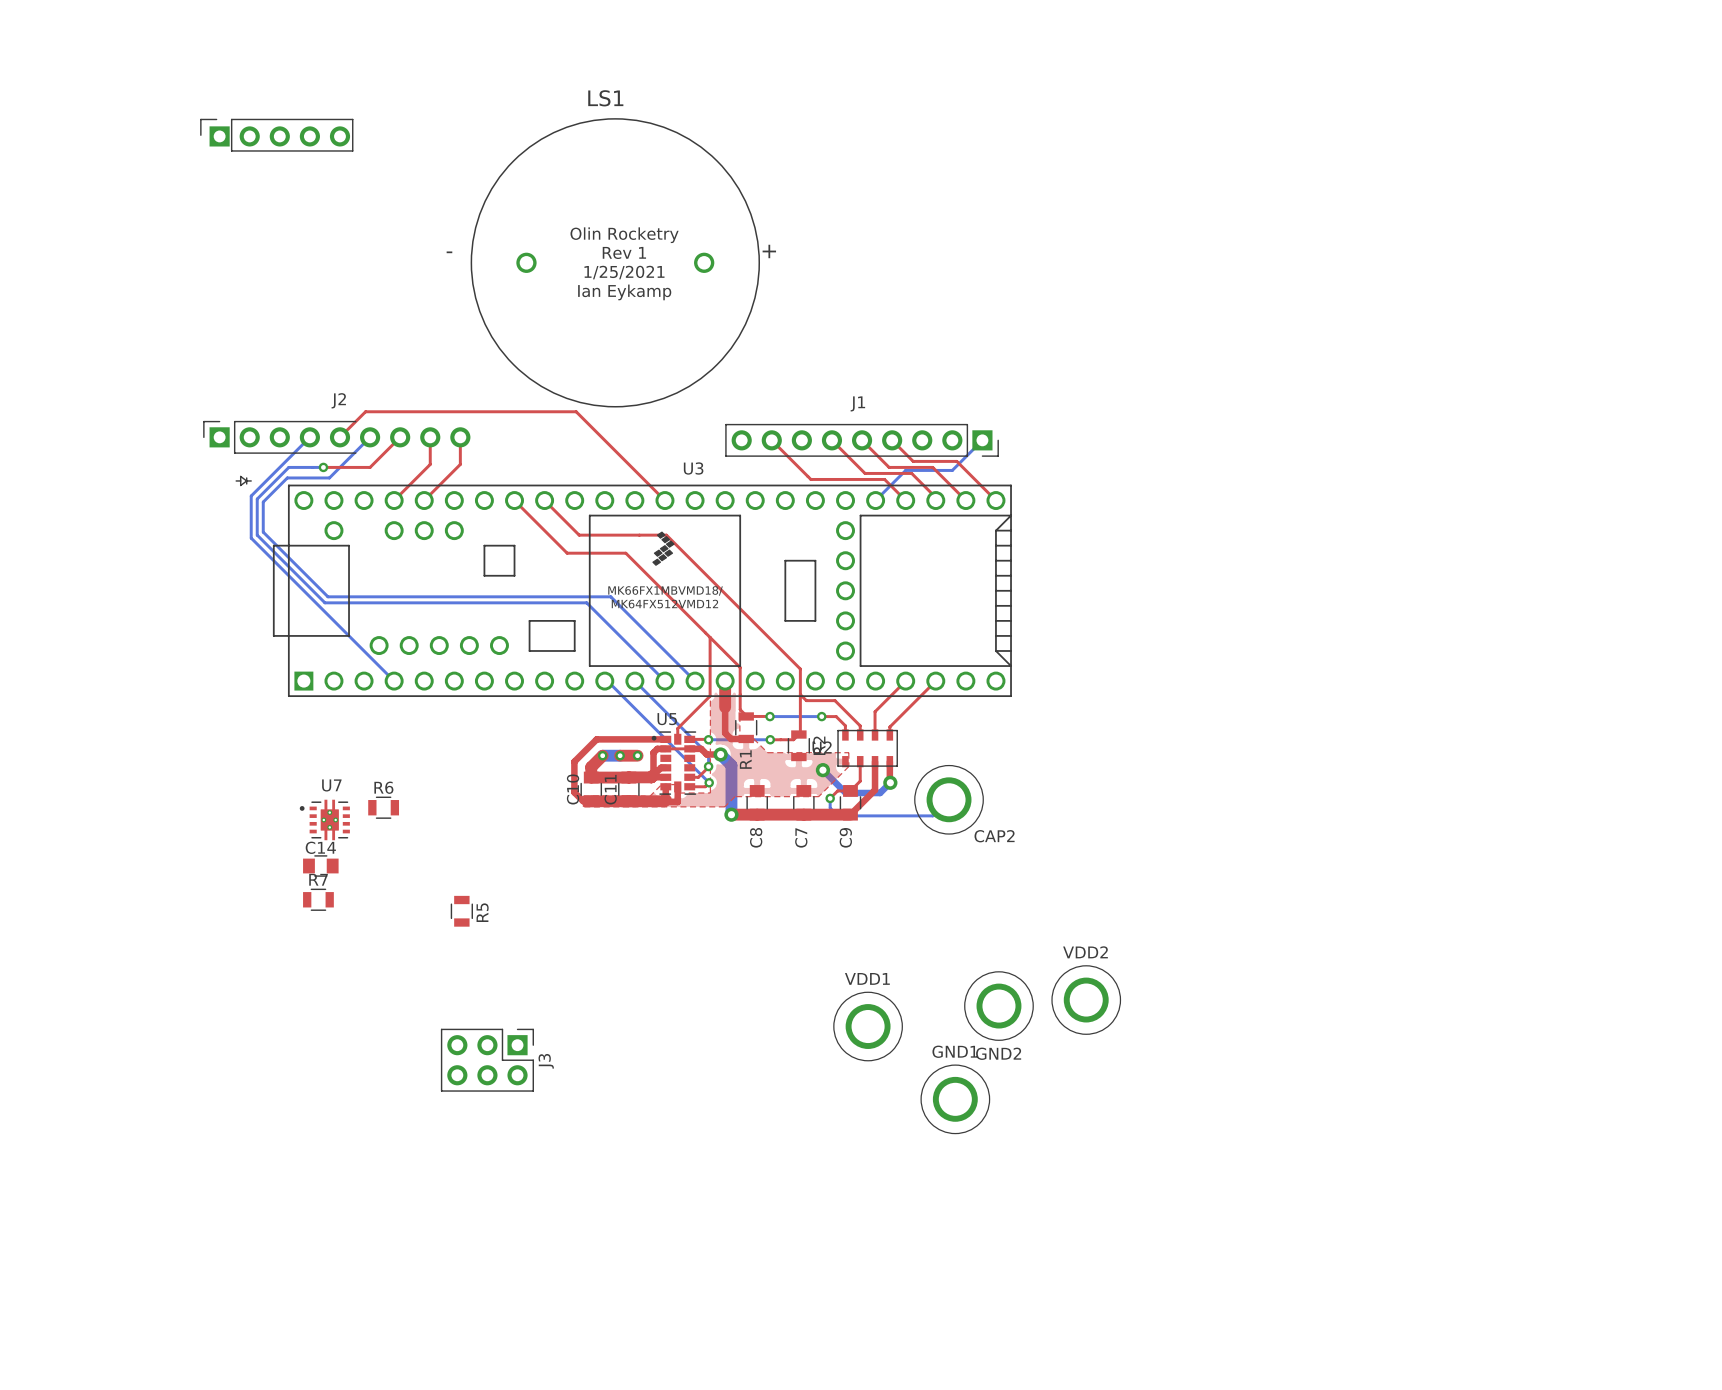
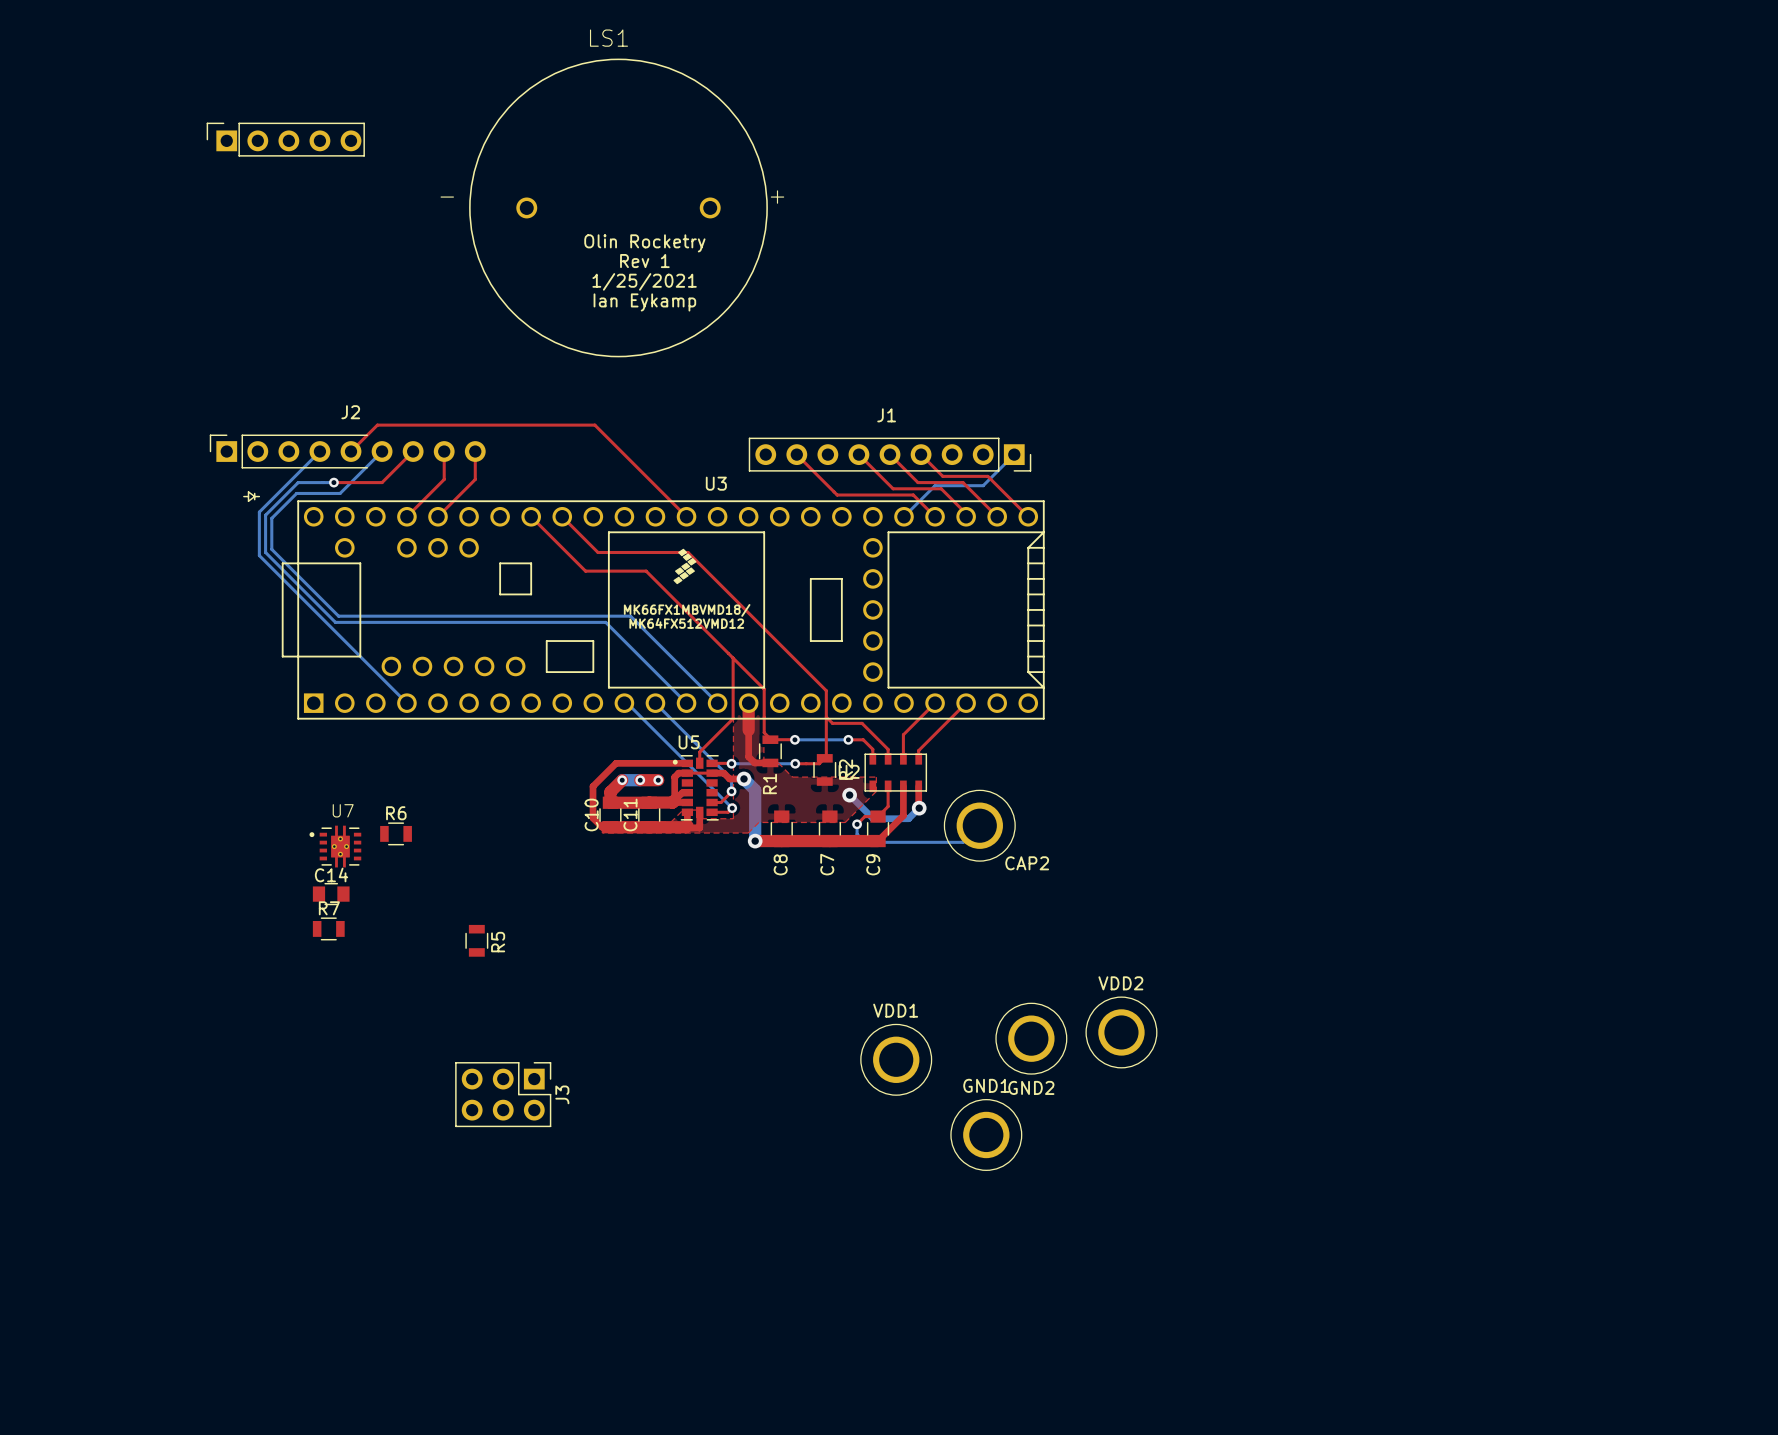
LS1 position: (615, 262) -> (618, 207)

